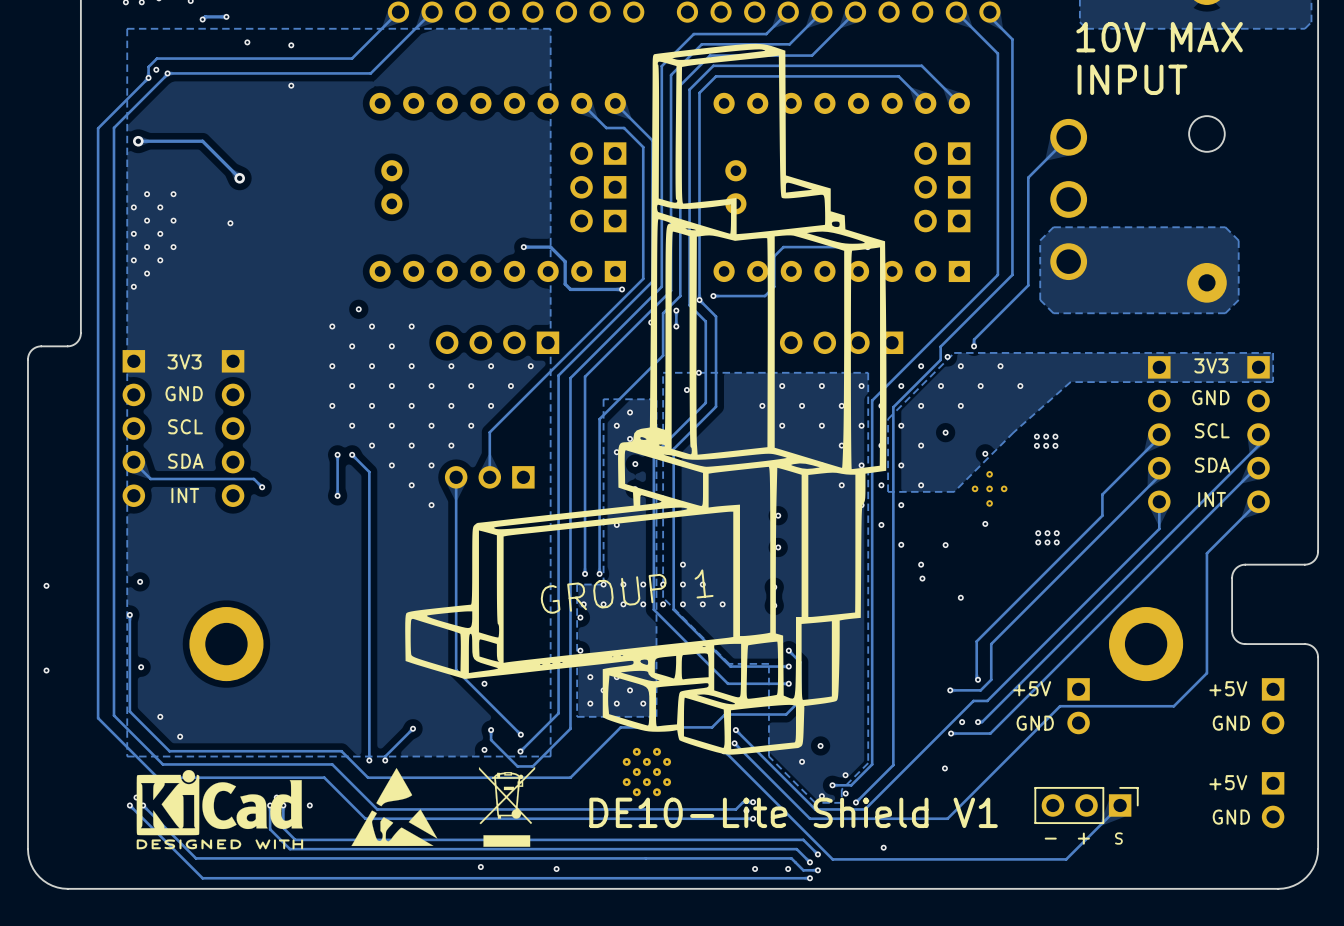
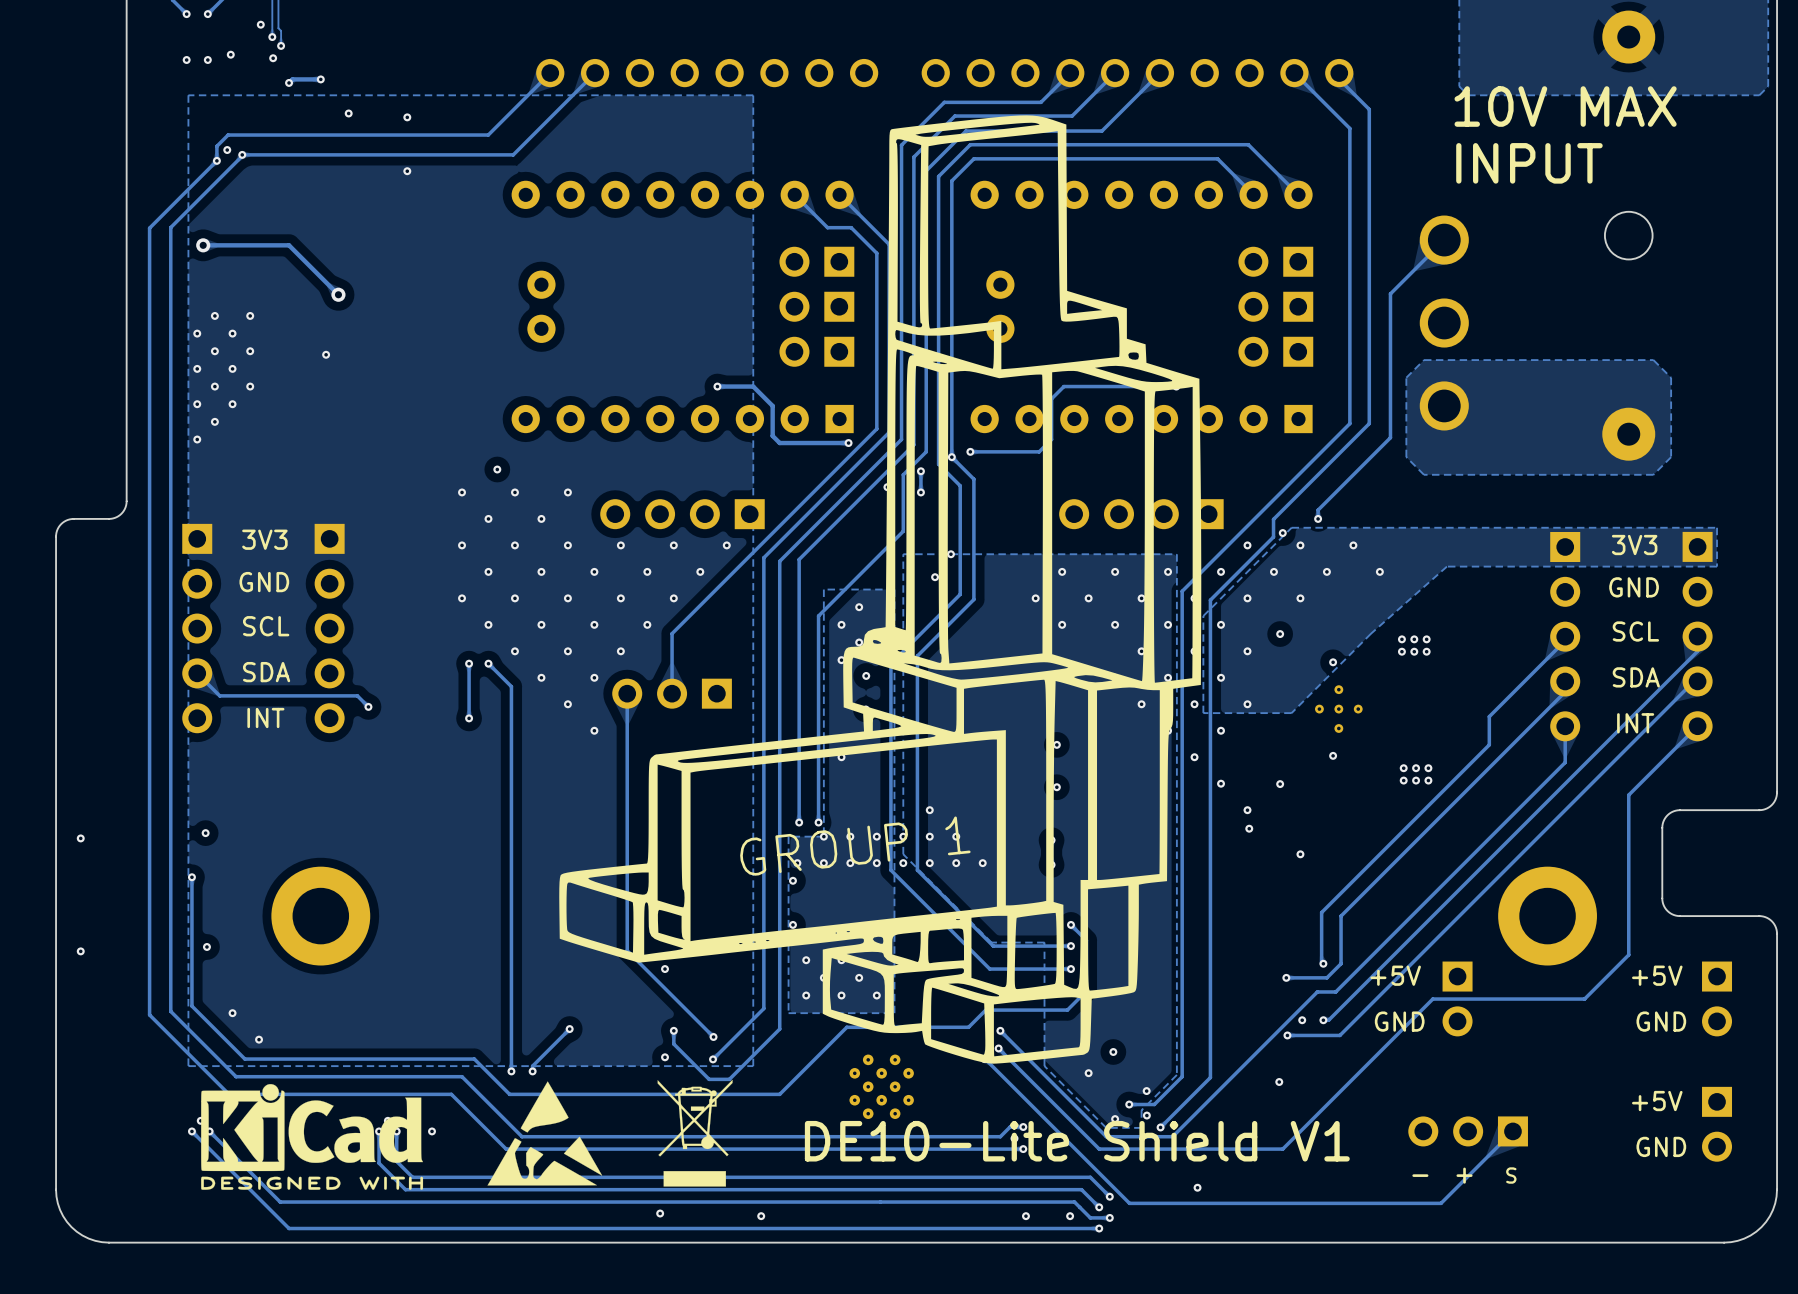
part side: bottom (1086, 805) -> top (1468, 1131)

